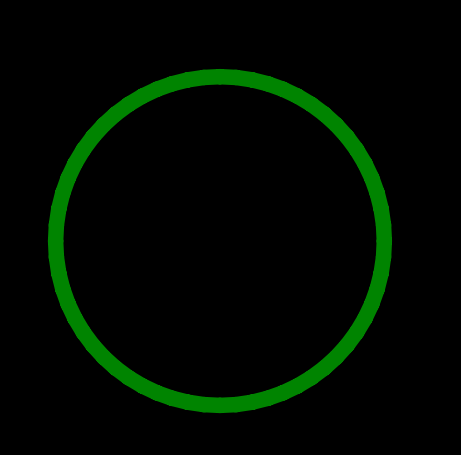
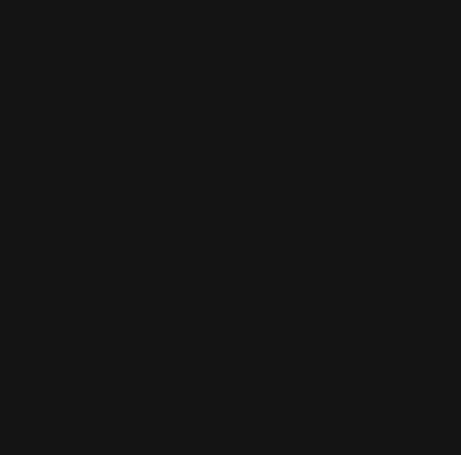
track: (219, 76) (187, 79) (157, 89) (128, 104) (103, 124) (83, 149) (68, 178) (58, 208) (55, 241) (58, 273) (68, 303) (83, 332) (103, 357) (128, 377) (157, 392) (187, 402) (219, 405) (252, 402) (282, 392) (311, 377) (336, 357) (356, 332) (371, 303) (381, 273) (384, 241) (381, 208) (371, 178) (356, 149) (336, 124) (311, 104) (282, 89) (252, 79) (219, 76) -> none

